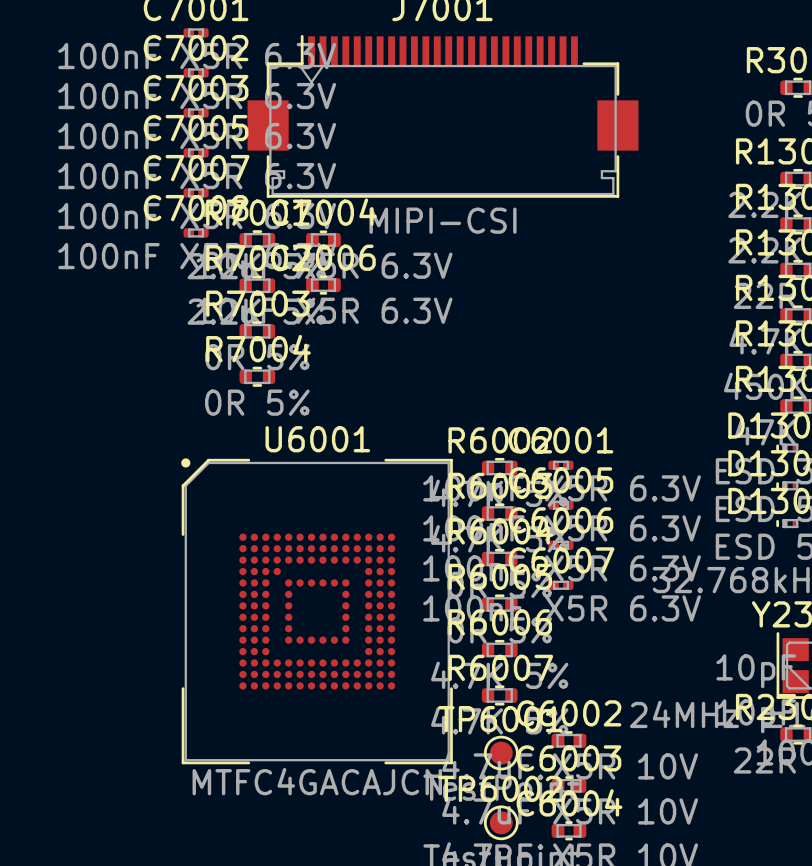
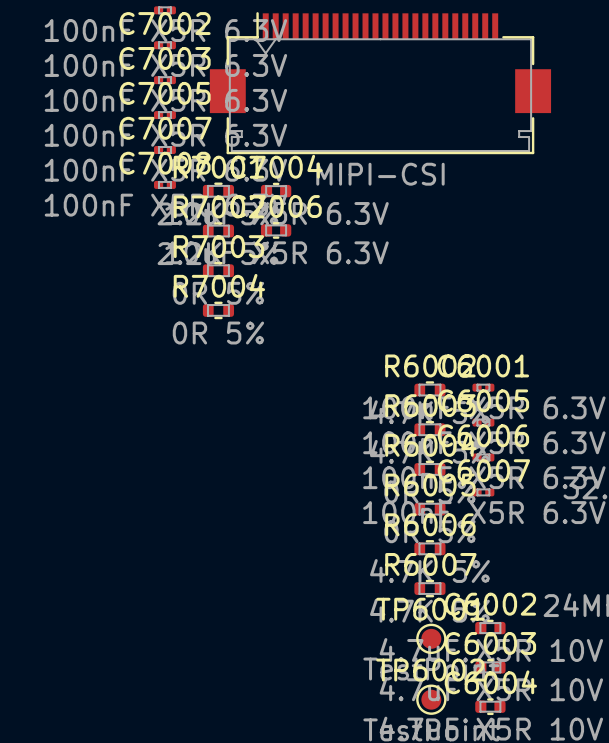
U6001: MTFC4GACAJCN (317, 611) -> none

